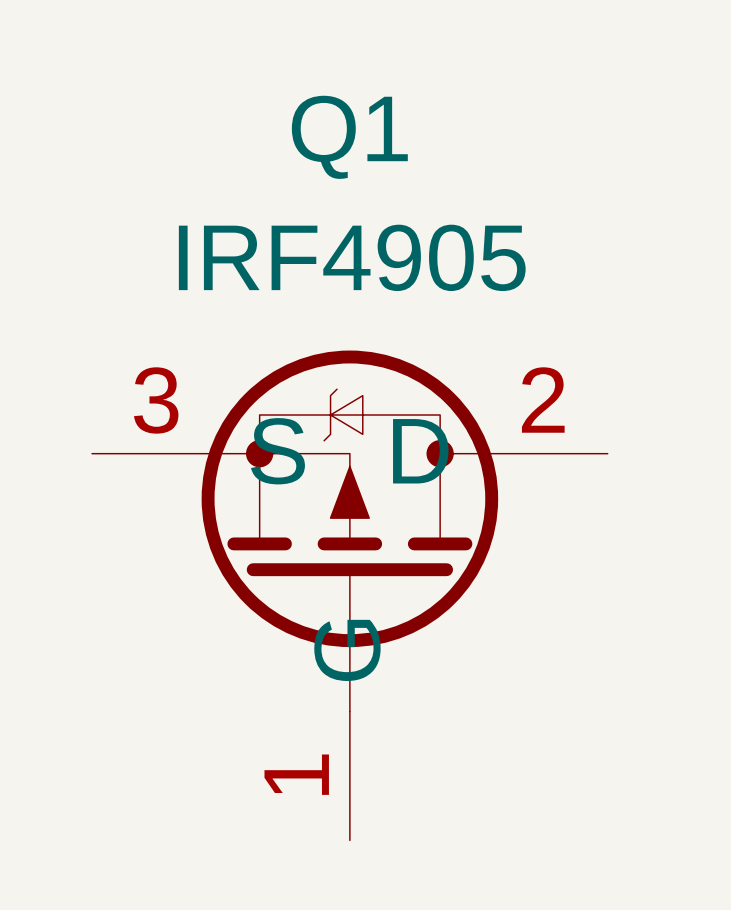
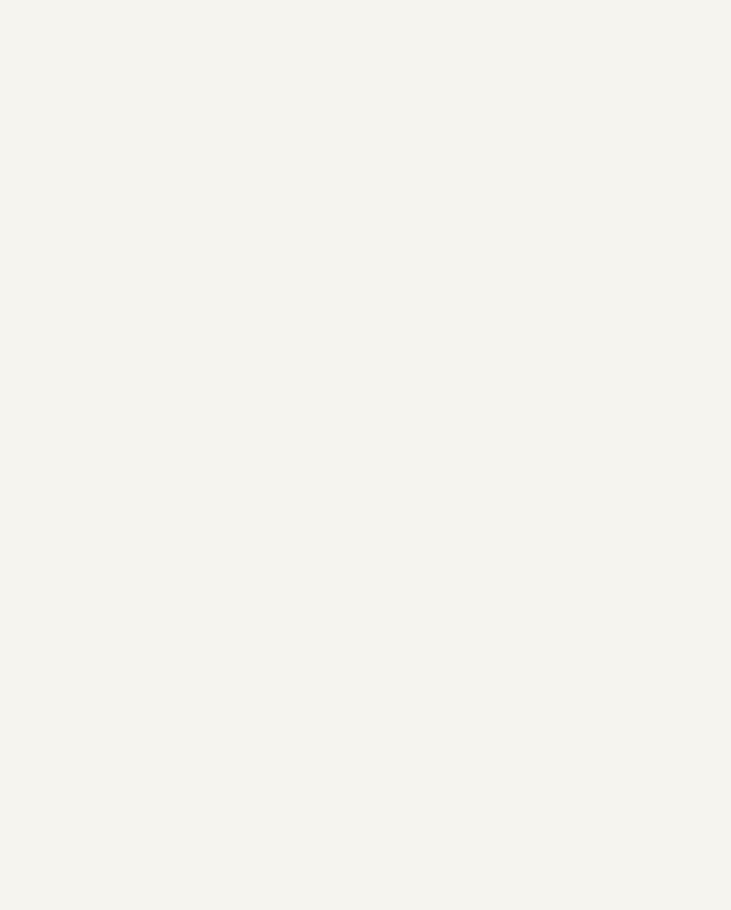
Q1: IRF4905 (349, 595) -> none

